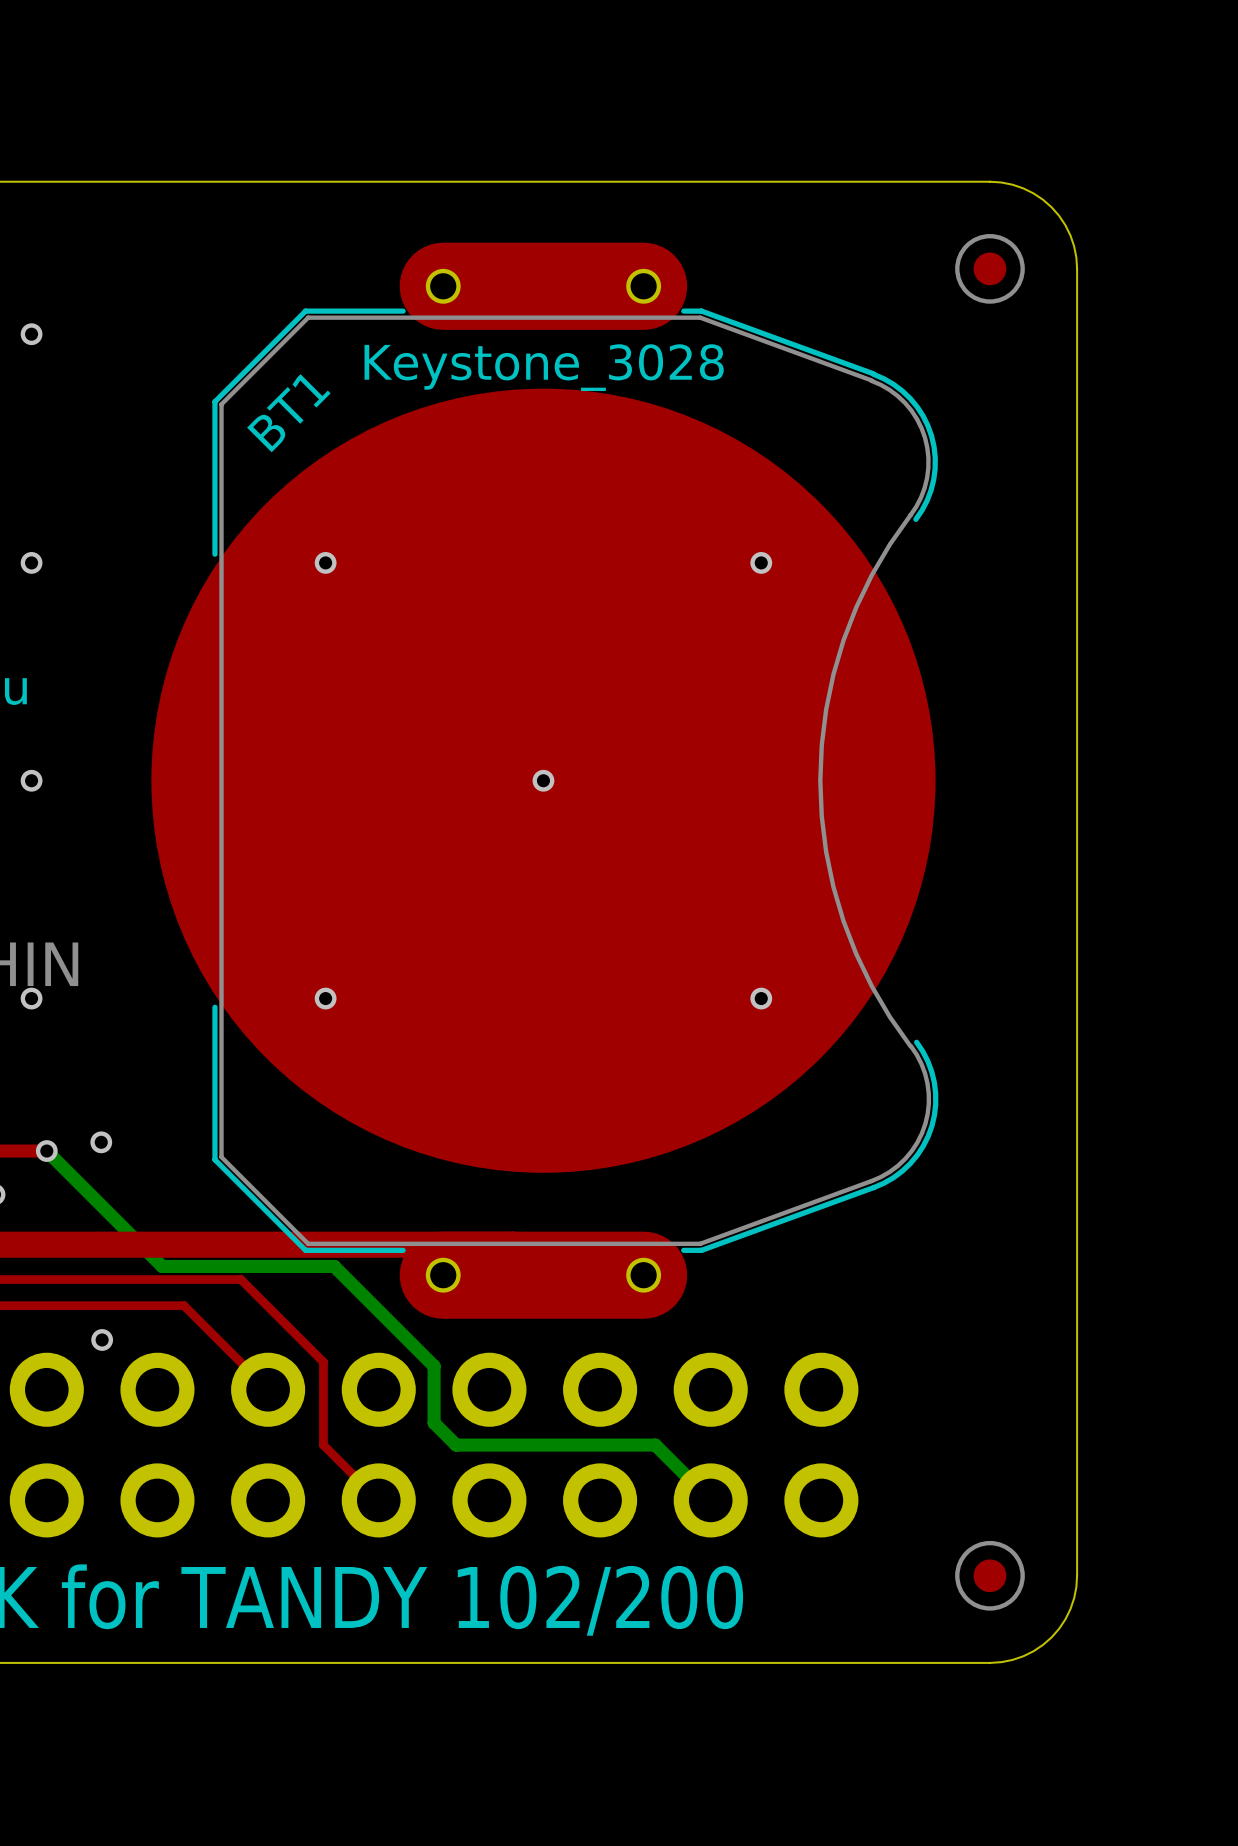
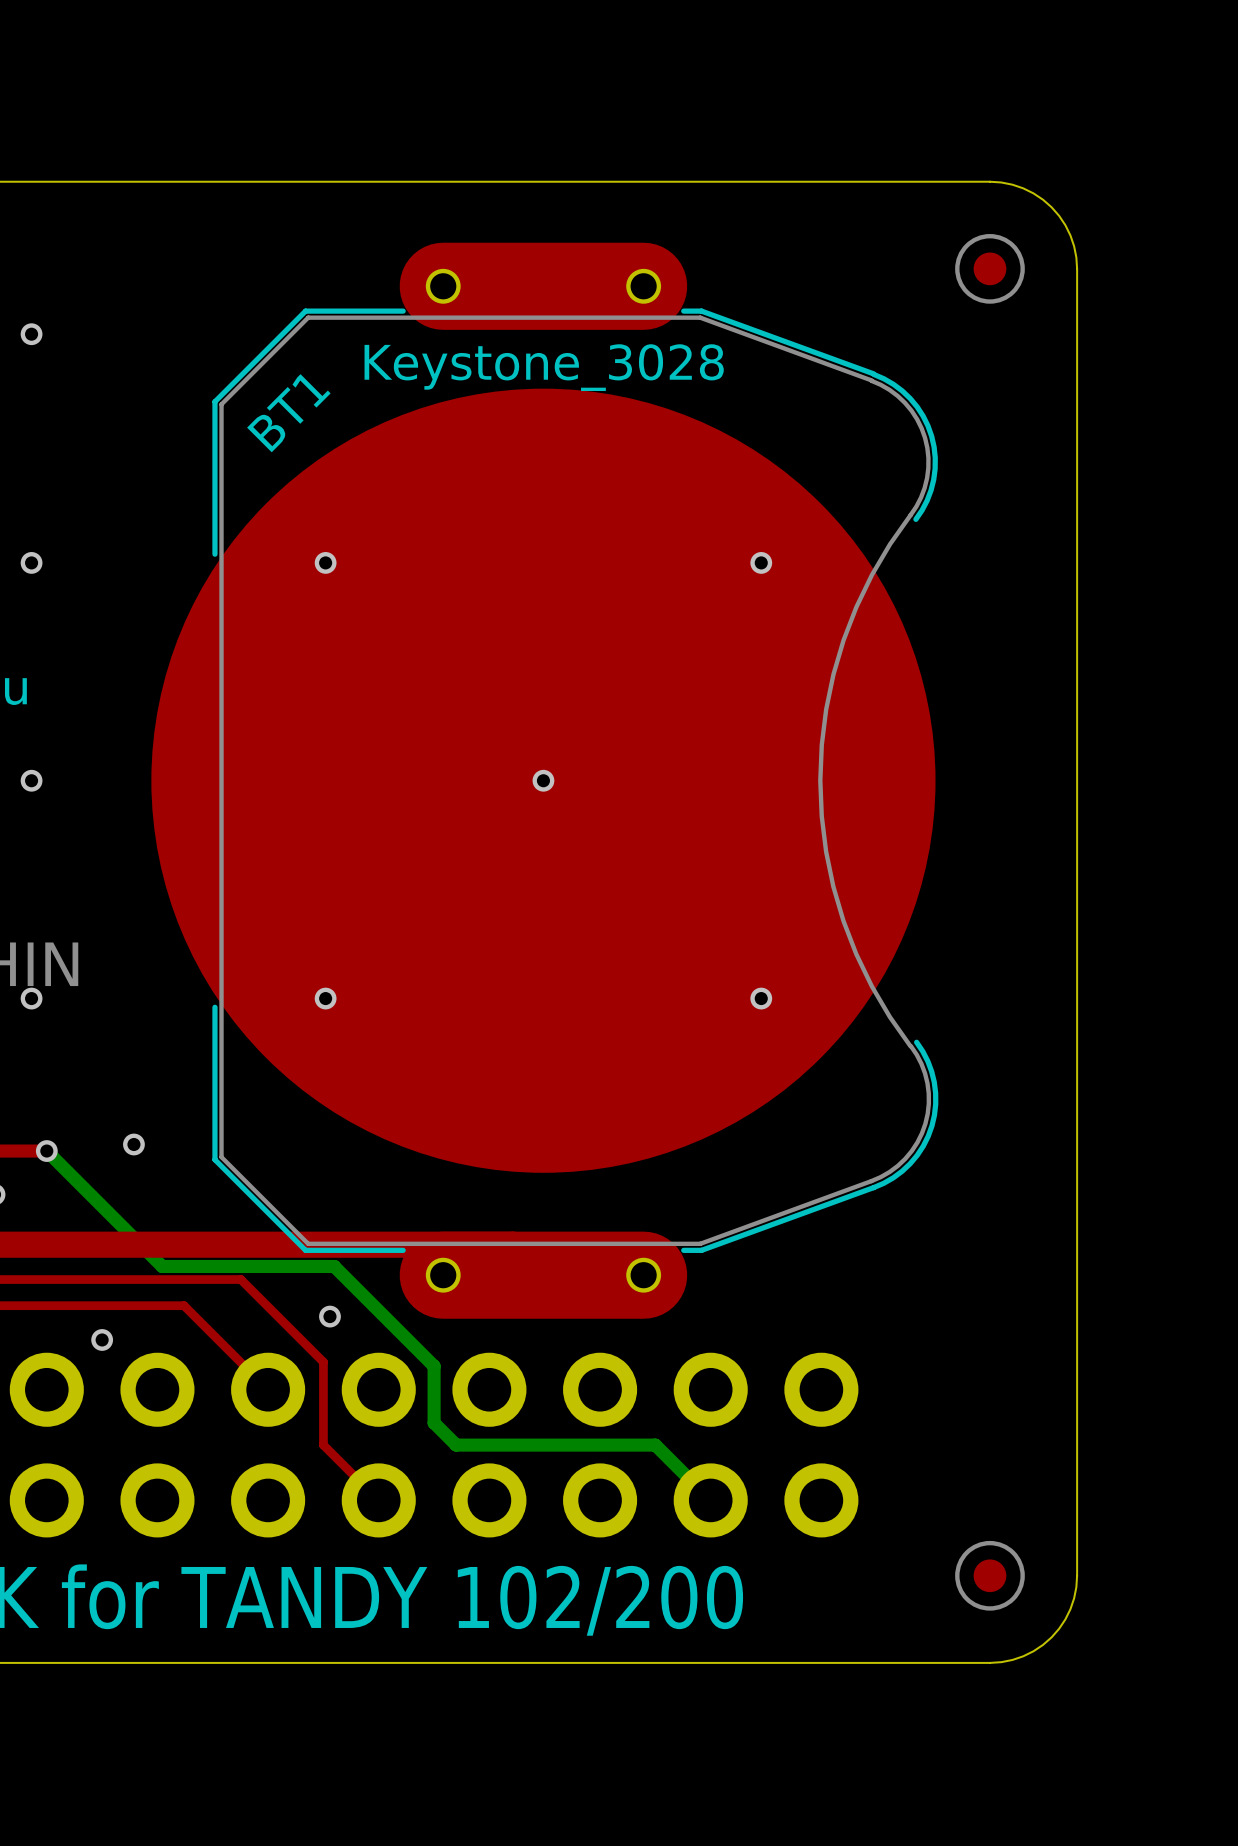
via position: (101, 1142) -> (133, 1144)
via: none -> (329, 1316)

